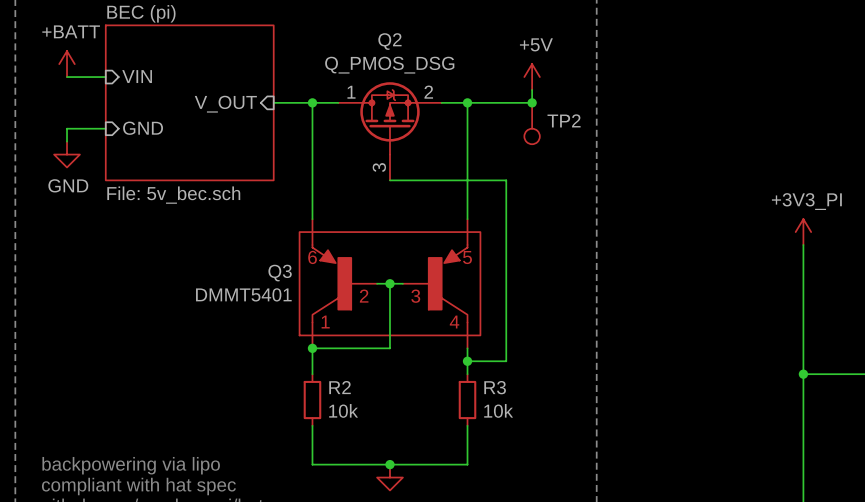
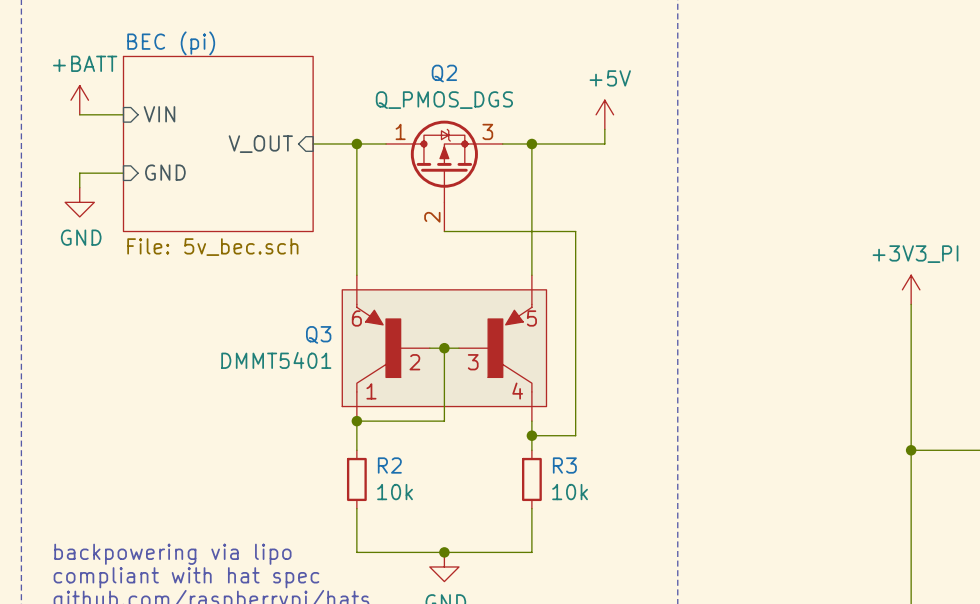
Q2 value: Q_PMOS_DSG (389, 65) -> Q_PMOS_DGS (444, 100)
Q2 pin number: 2 (428, 92) -> 3 (487, 131)
junction: (532, 102) -> none
TP2: (532, 123) -> none
Q2 pin number: 3 (379, 167) -> 2 (432, 217)

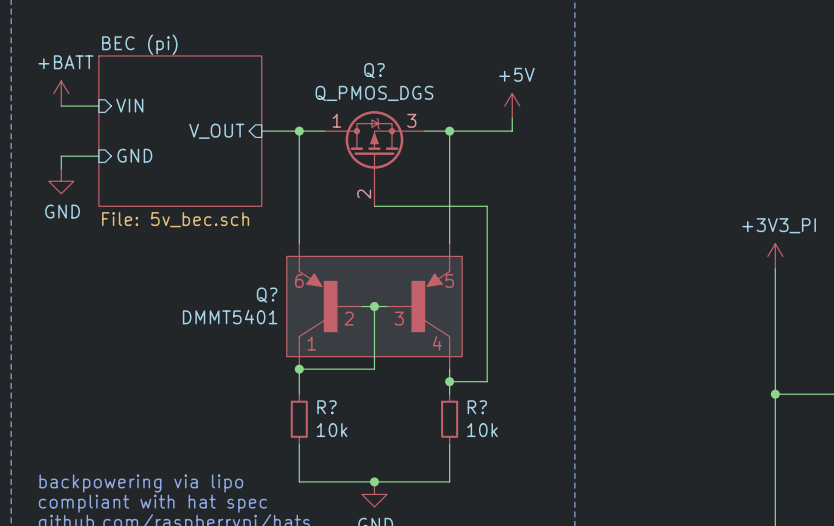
Q2 name: Q2 (444, 73) -> Q? (374, 70)
Q3 name: Q3 (318, 334) -> Q? (267, 295)
R2 name: R2 (389, 465) -> R? (327, 407)
R3 name: R3 (564, 465) -> R? (477, 407)

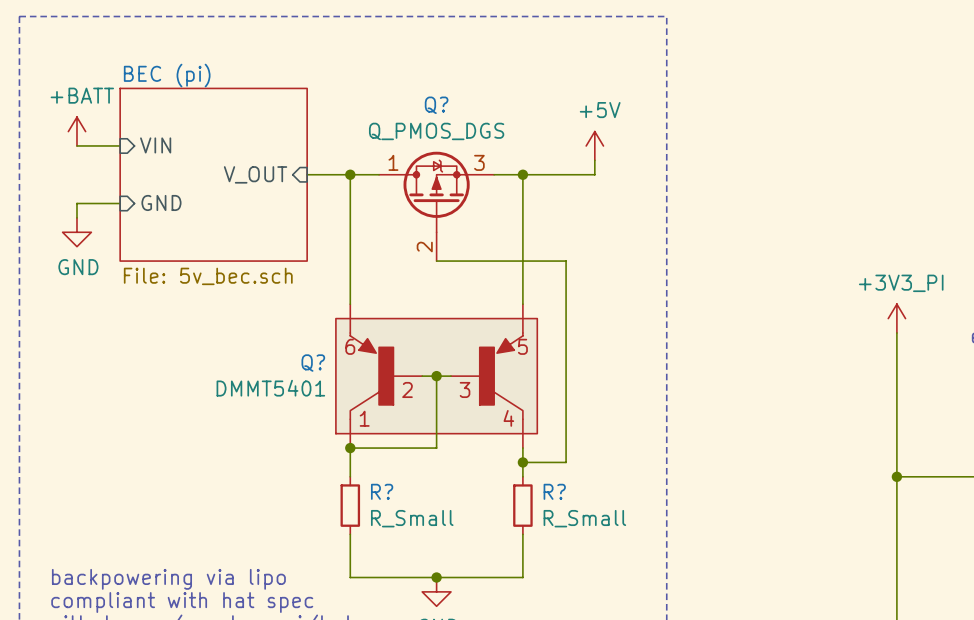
R? value: 10k (332, 430) -> R_Small (412, 518)
R? value: 10k (482, 430) -> R_Small (584, 518)

